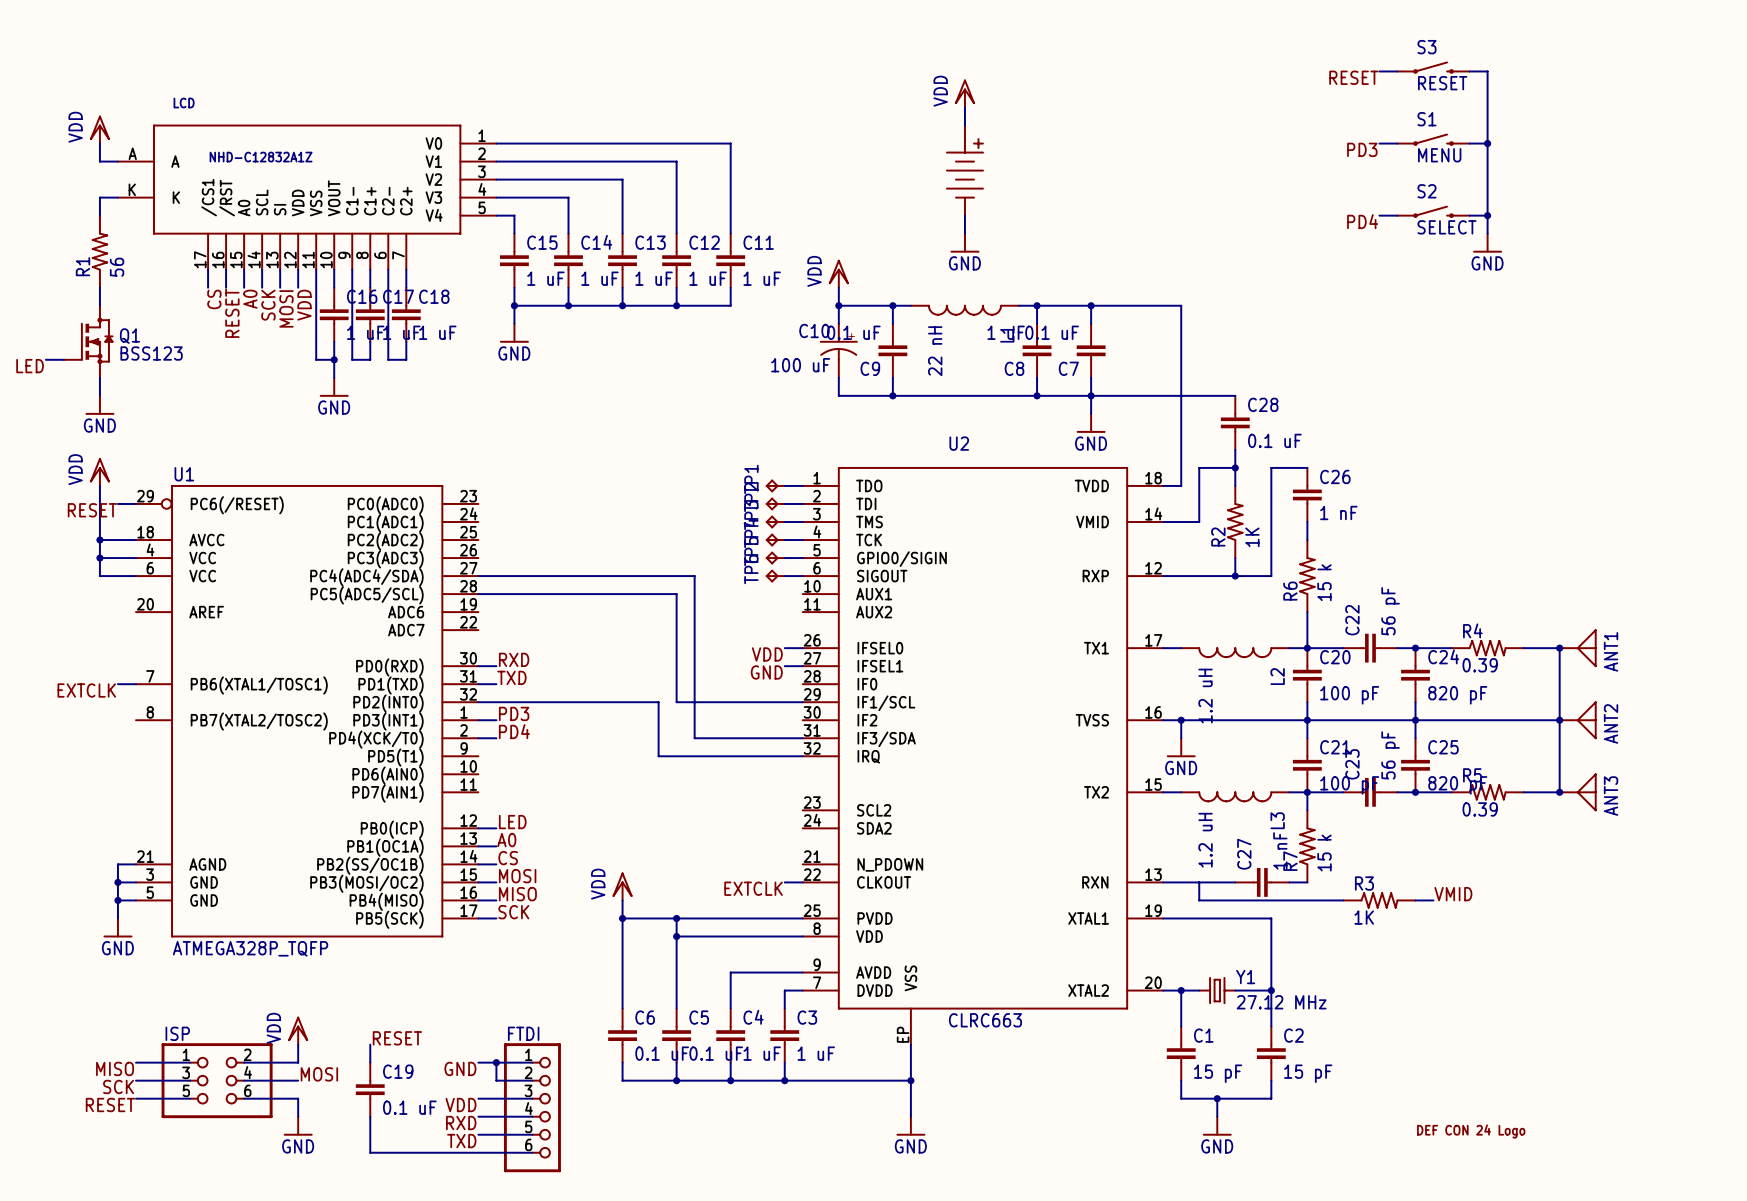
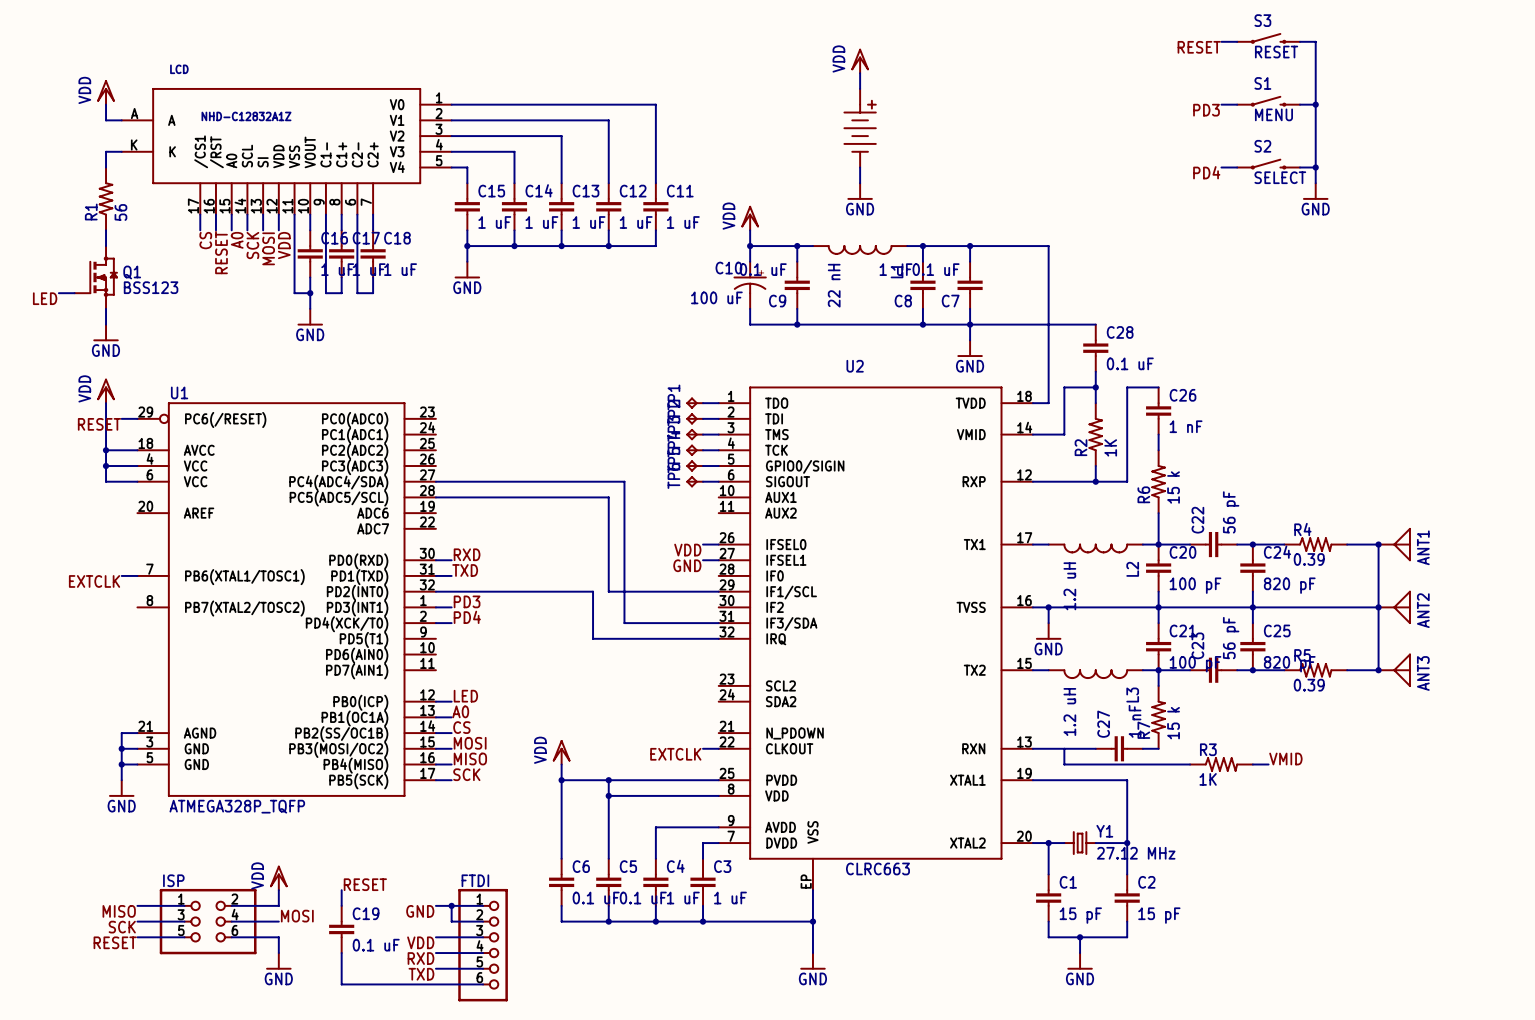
part: (1471, 1131) -> none

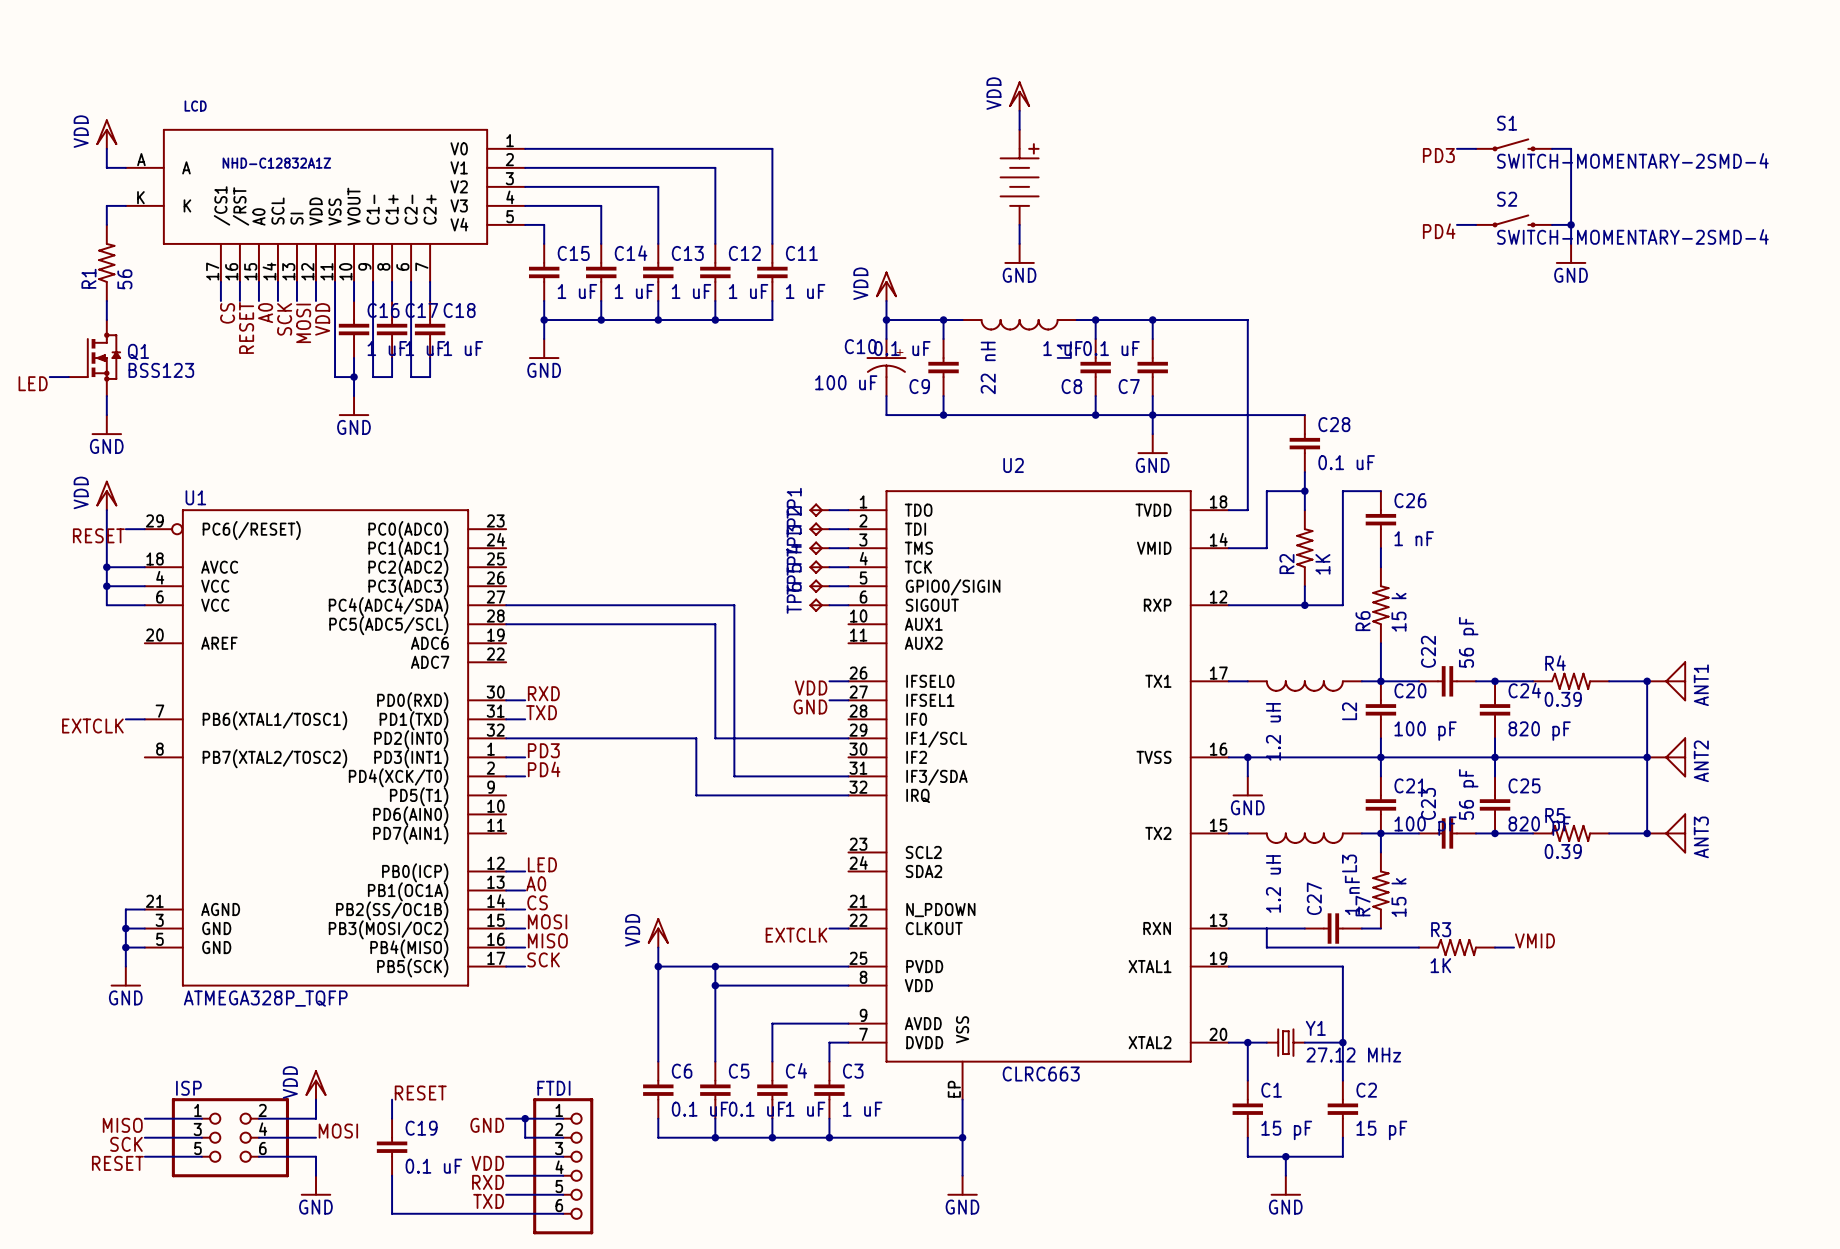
S3: RESET (1268, 38) -> none
wire: (1221, 41) (1237, 41) -> none
wire: (1300, 41) (1315, 41) (1315, 104) -> none
label: RESET (1199, 47) -> none
junction: (1315, 104) -> none
S1 value: MENU (1273, 114) -> SWITCH-MOMENTARY-2SMD-4 (1632, 160)
S2 value: SELECT (1280, 177) -> SWITCH-MOMENTARY-2SMD-4 (1632, 236)

